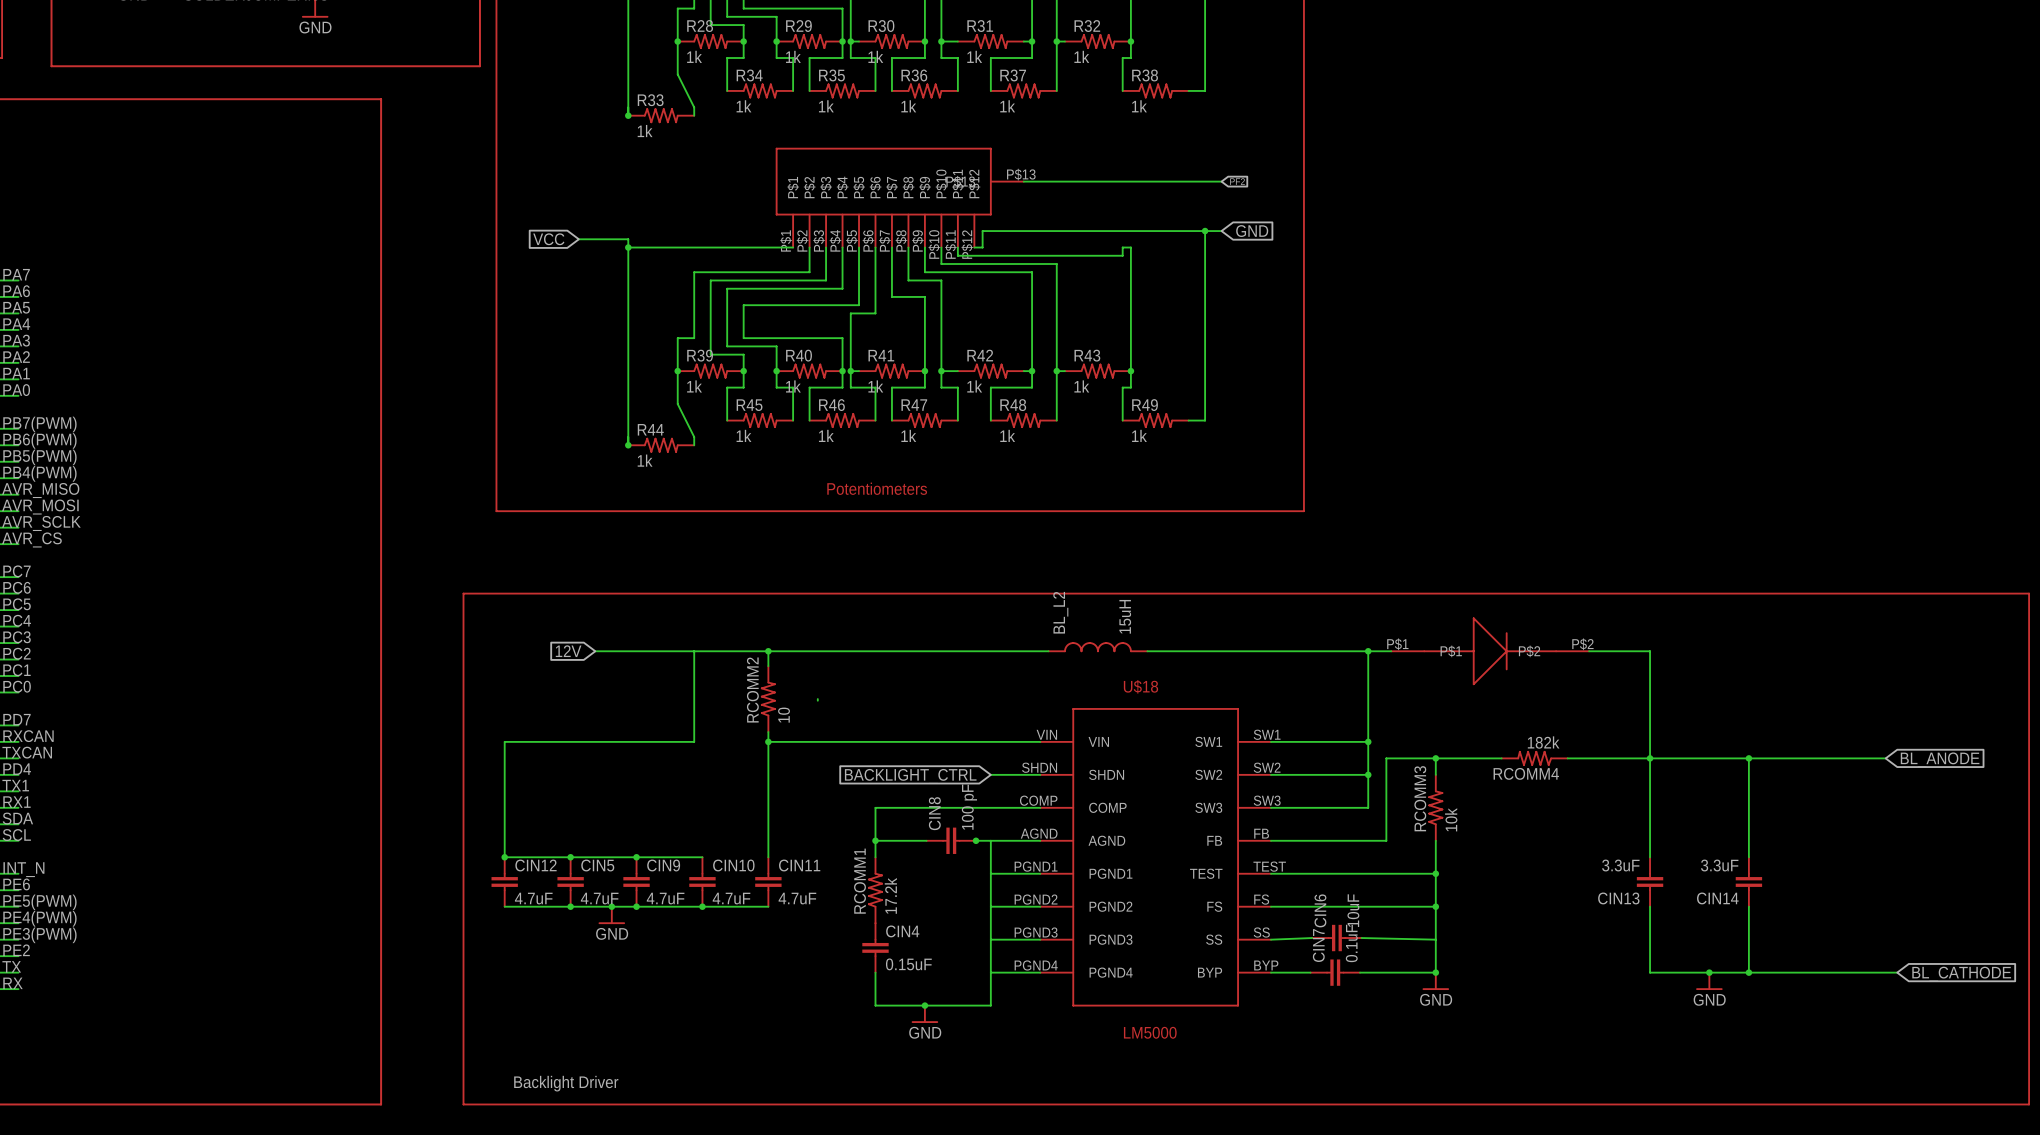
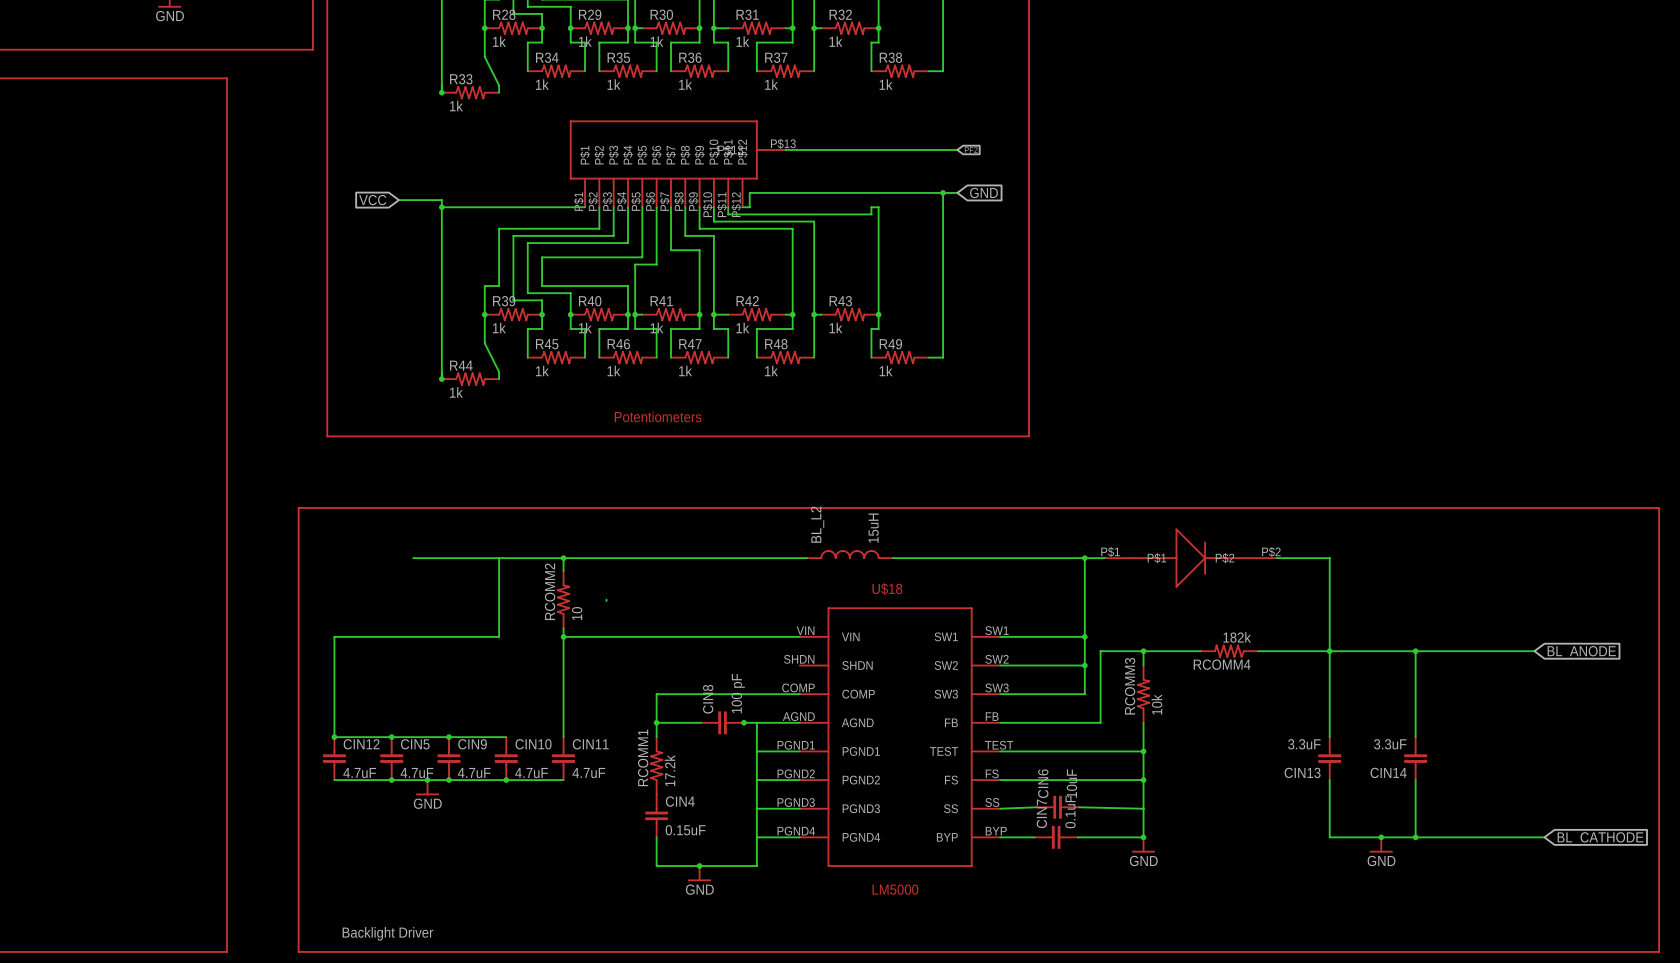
global label: 12V (568, 651) -> none
wire: (990, 774) (1040, 774) -> none
global label: BACKLIGHT_CTRL (910, 776) -> none

